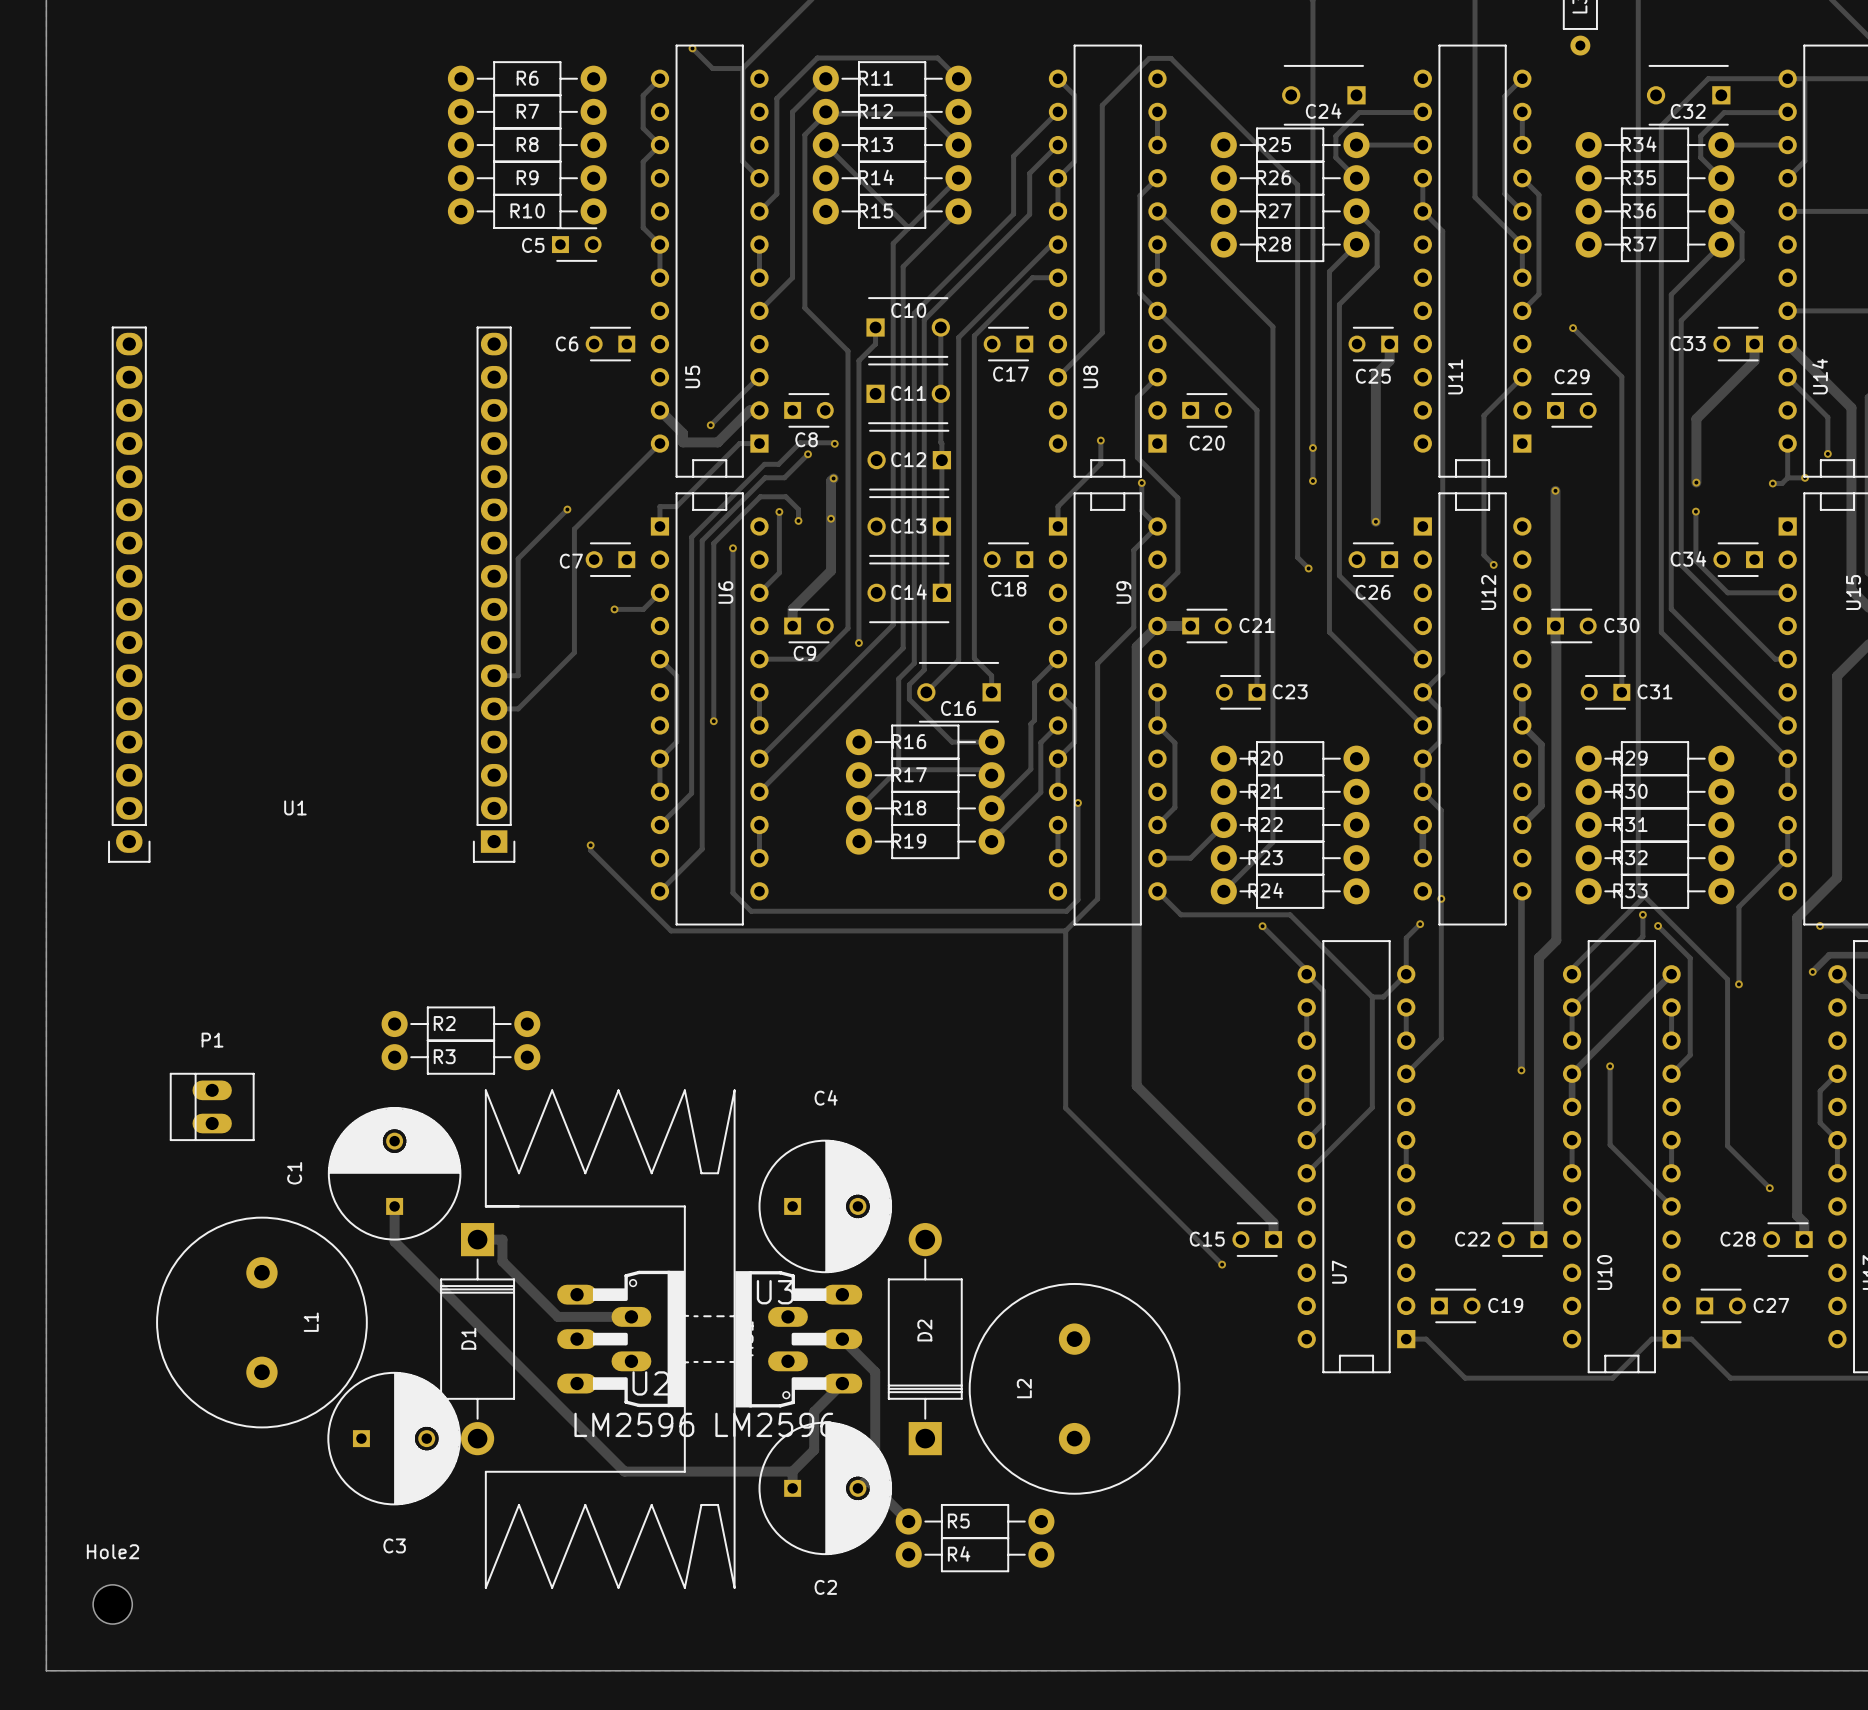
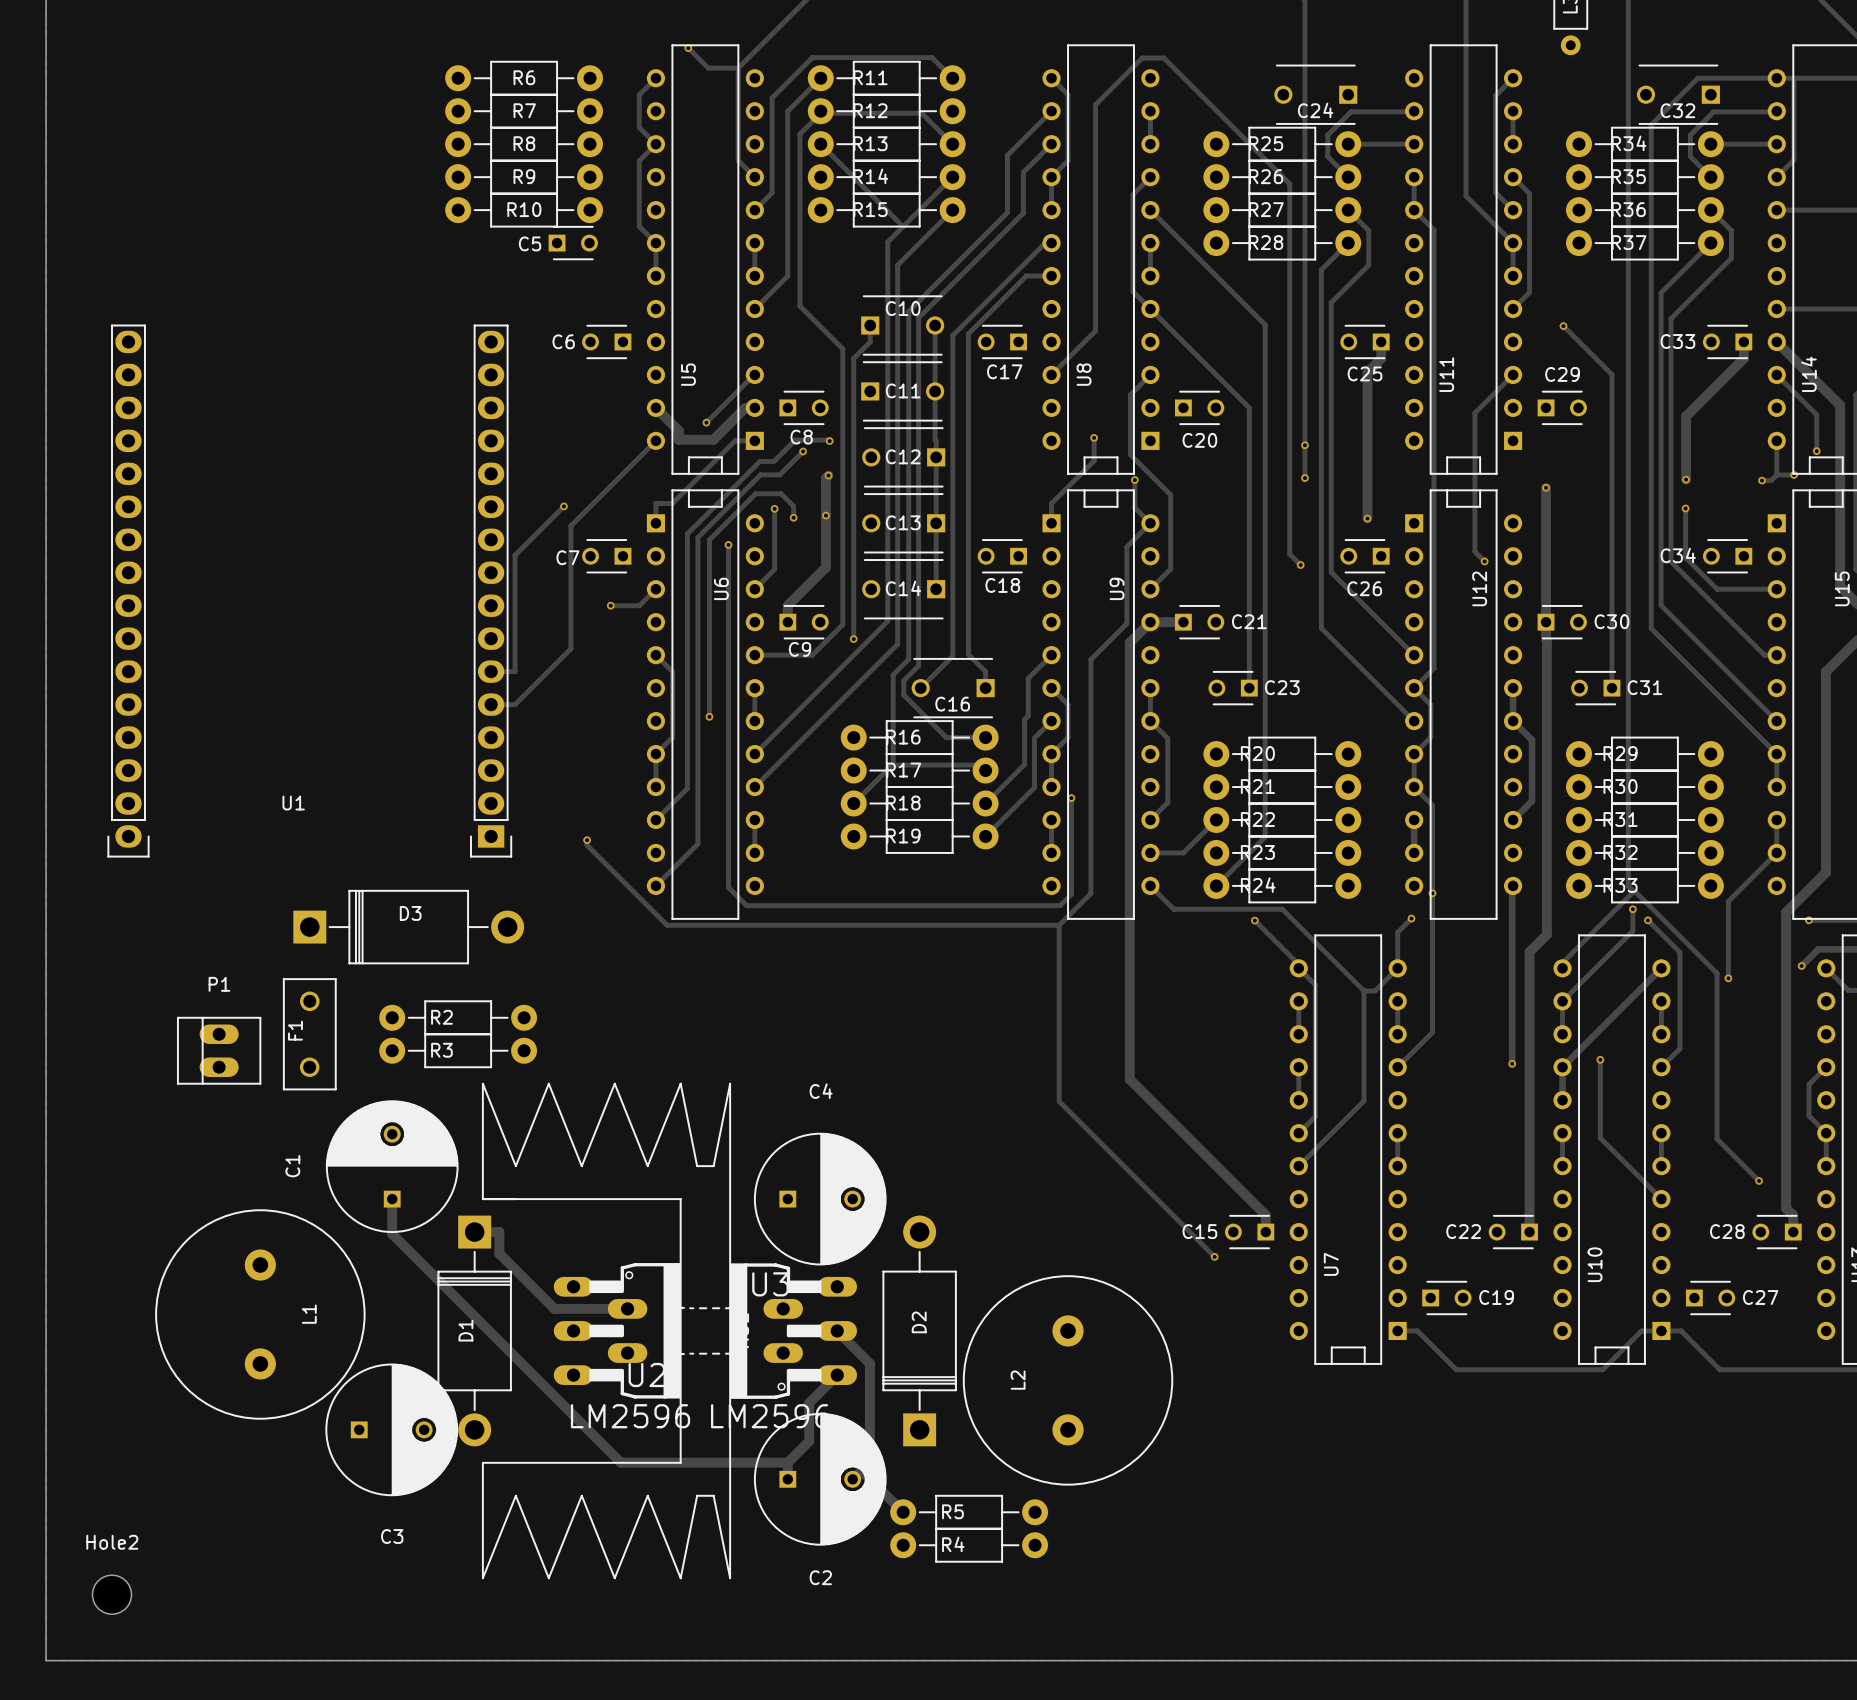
D3: none -> (408, 927)
F1: none -> (309, 1034)
P1 position: (212, 1106) -> (219, 1050)

